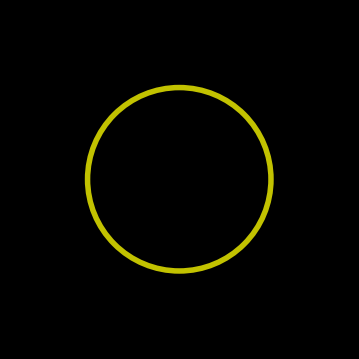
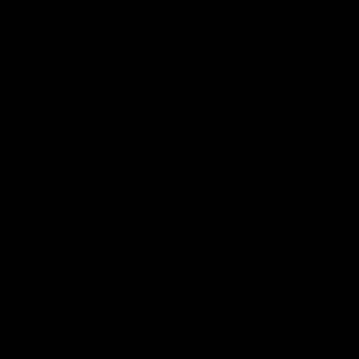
round board edge: [84, 84, 274, 274] -> none

